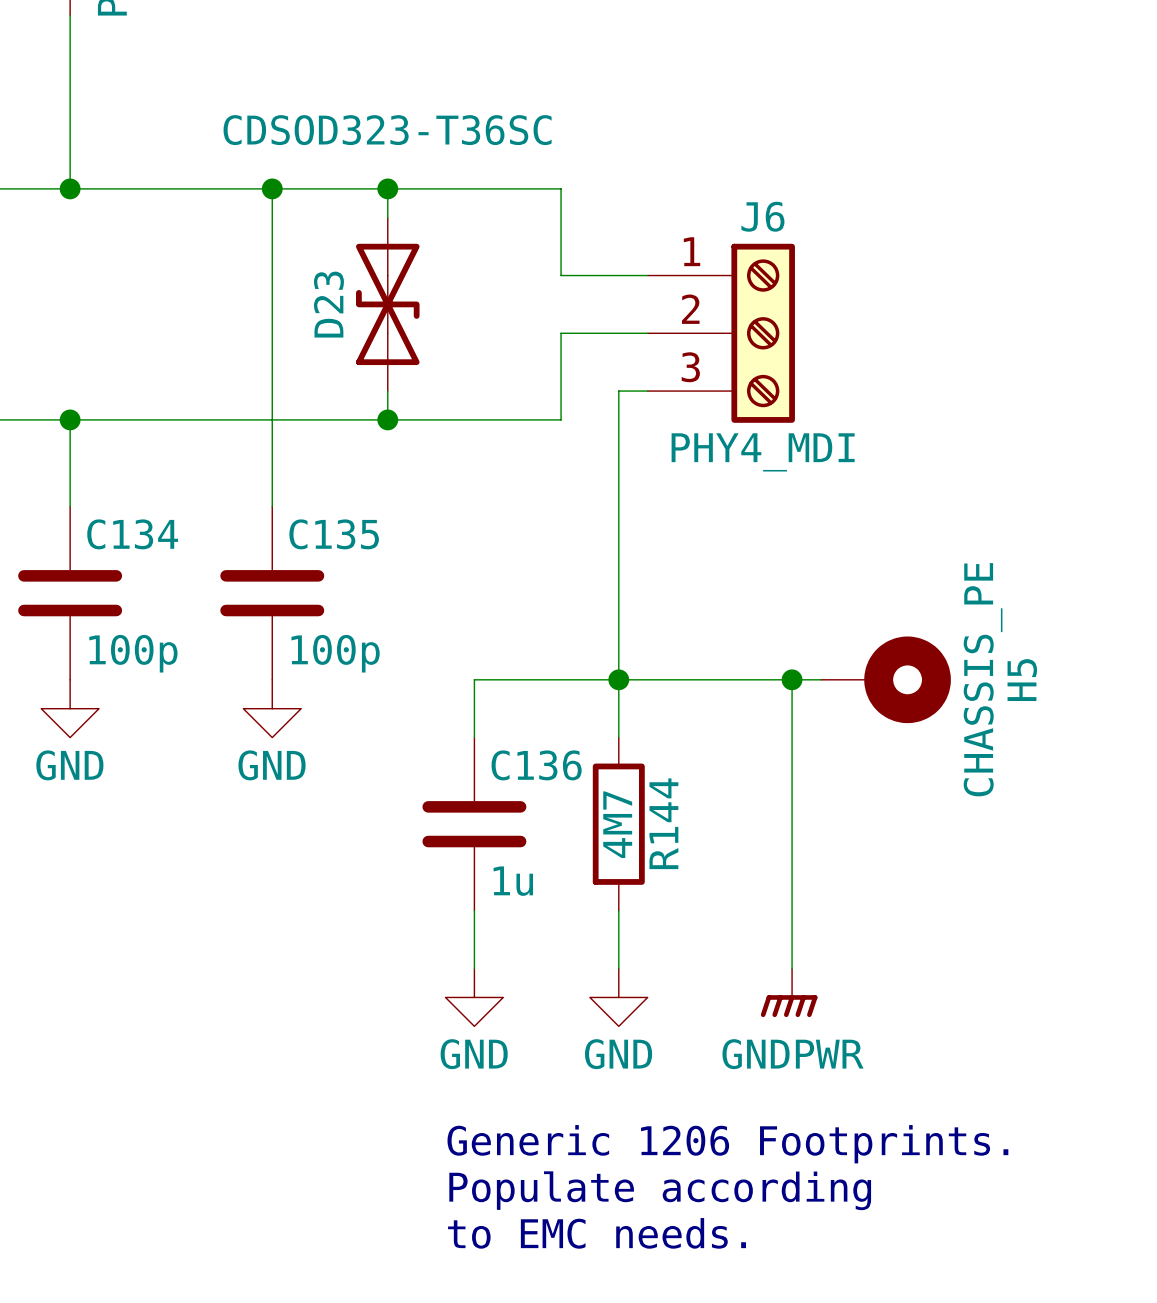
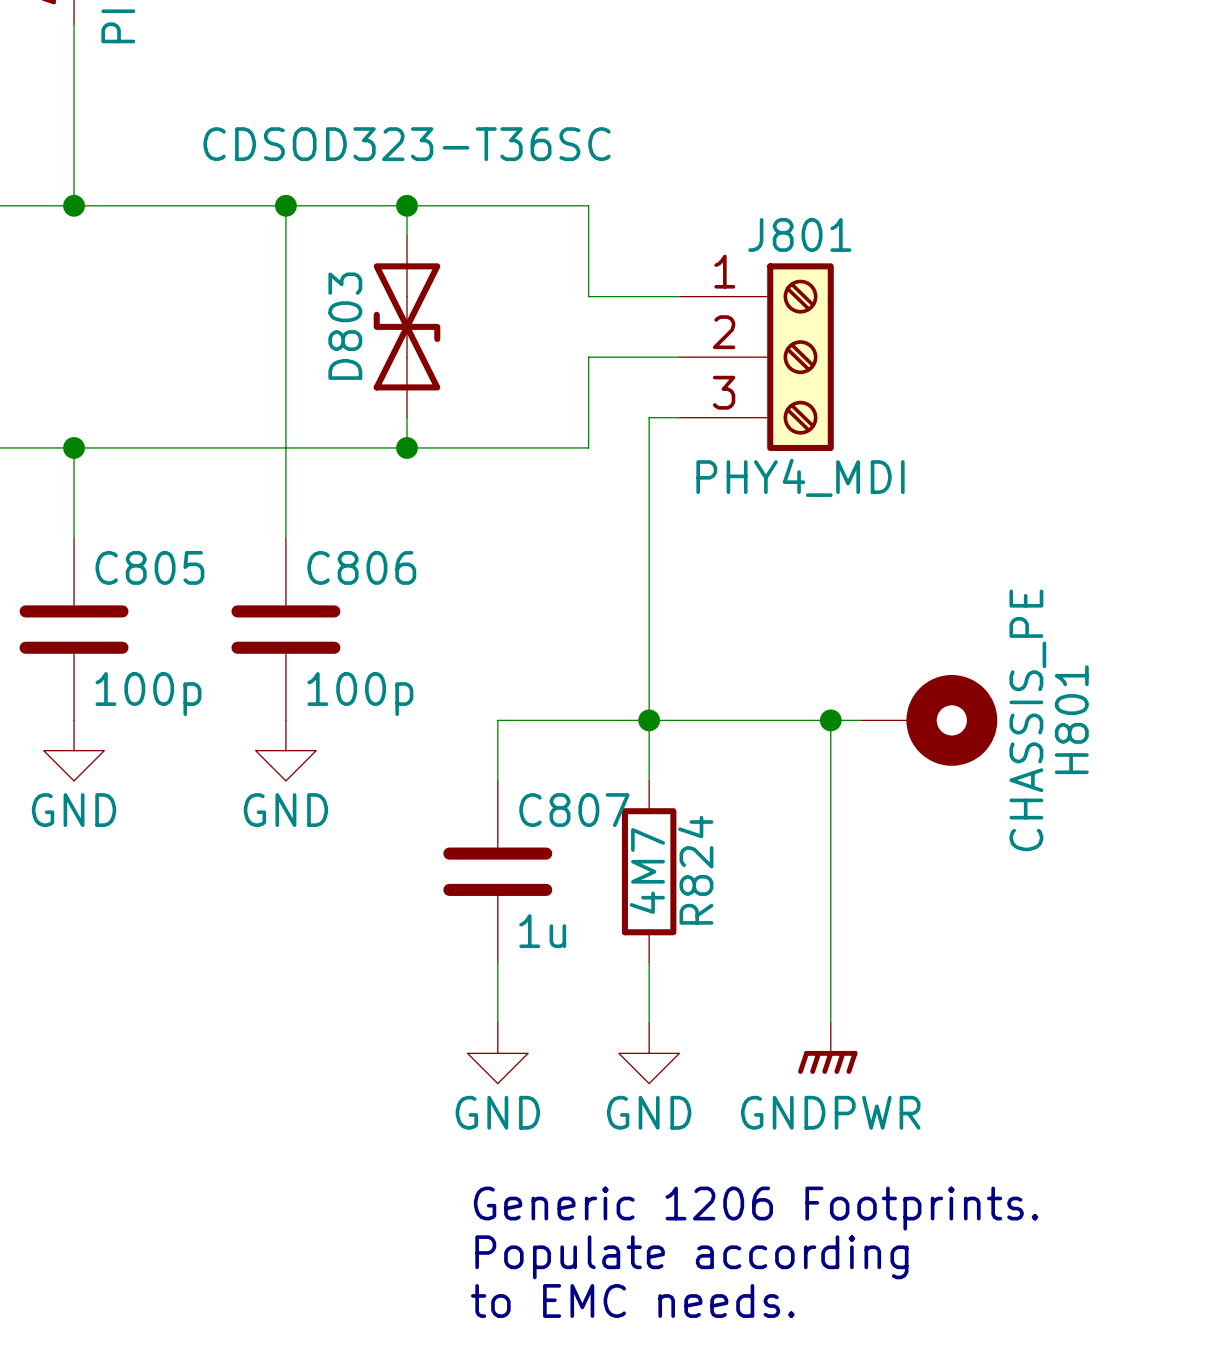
J6 name: J6 (762, 216) -> J801 (799, 234)
D23 name: D23 (328, 304) -> D803 (345, 326)
C134 name: C134 (132, 534) -> C805 (149, 567)
C135 name: C135 (334, 534) -> C806 (361, 567)
H5 name: H5 (1022, 680) -> H801 (1071, 719)
C136 name: C136 (536, 765) -> C807 (574, 810)
R144 name: R144 (663, 823) -> R824 (695, 870)

